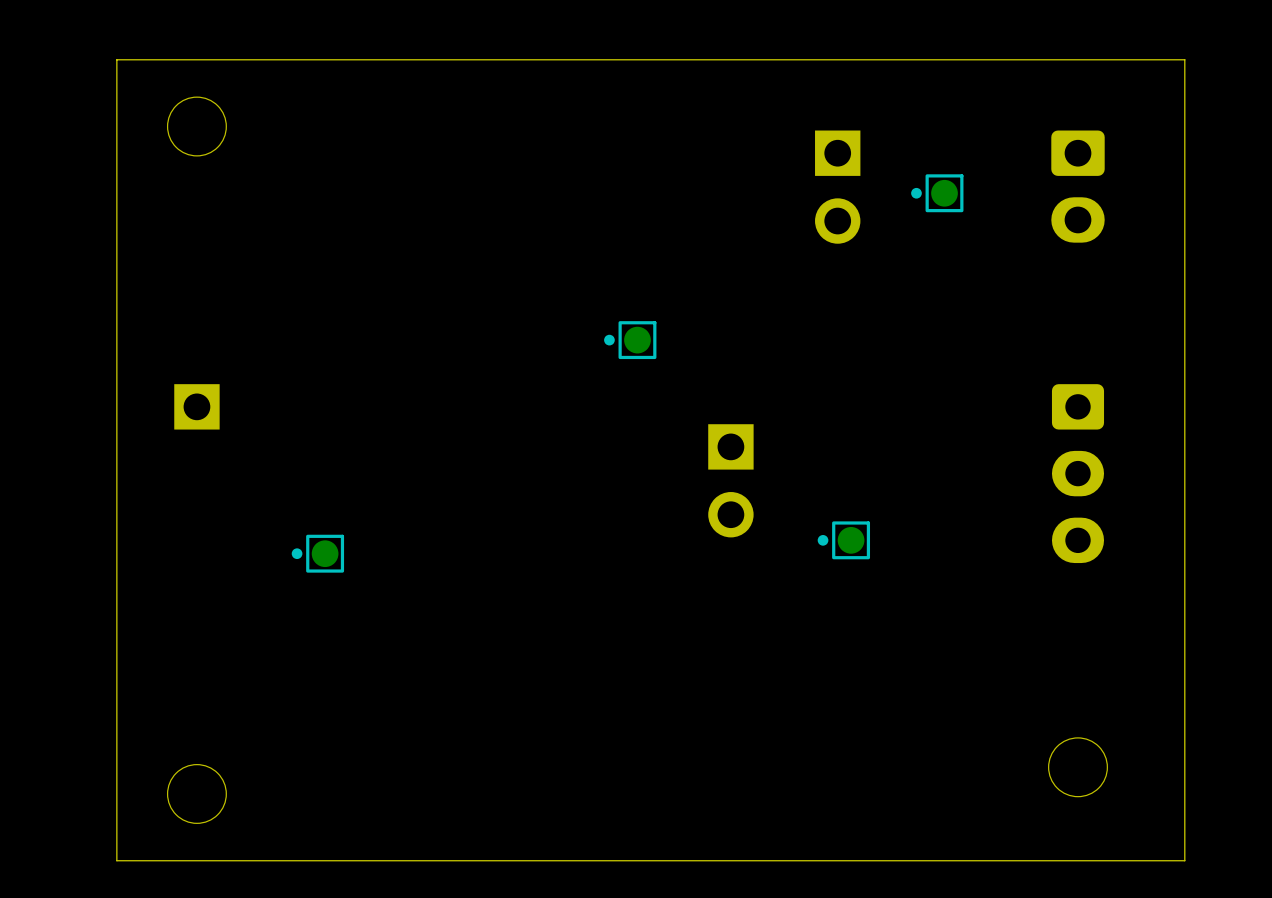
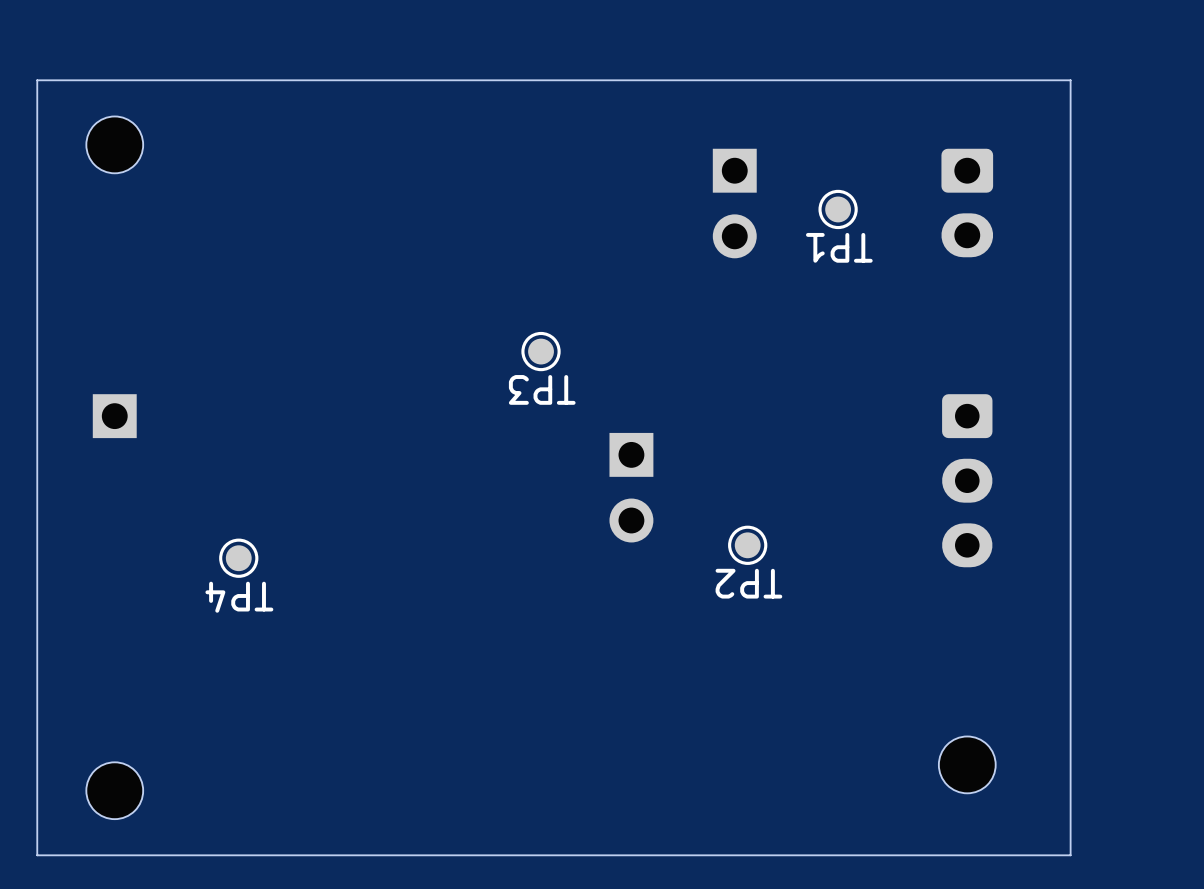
part: (937, 193) -> none
TP1: none -> (838, 209)
part: (630, 340) -> none
TP3: none -> (541, 351)
part: (843, 540) -> none
TP2: none -> (747, 545)
part: (317, 553) -> none
TP4: none -> (238, 558)

